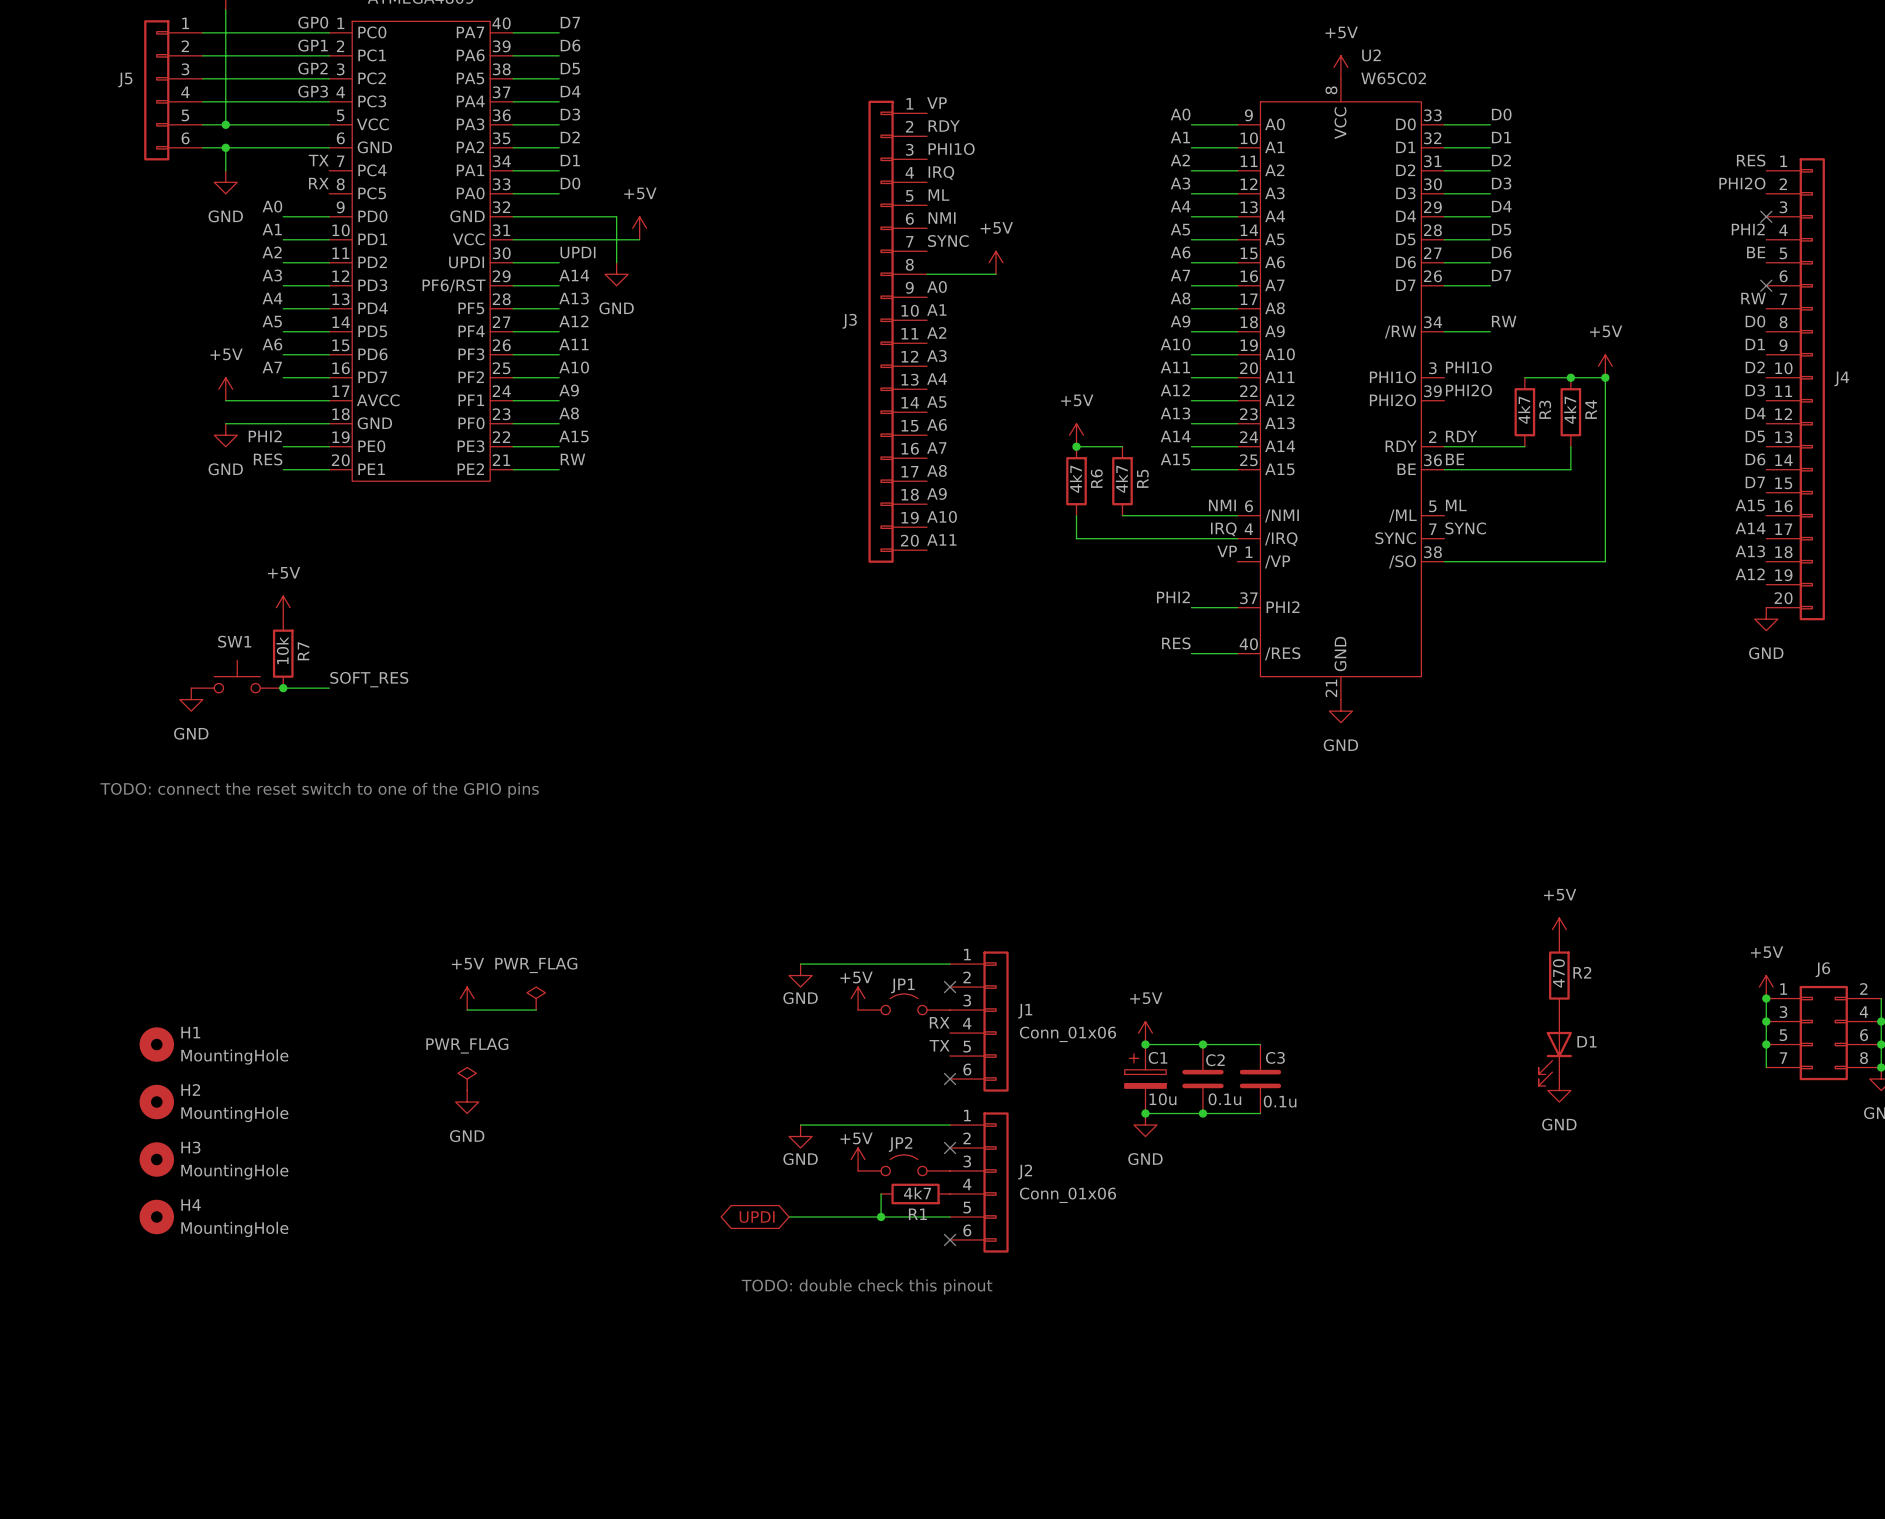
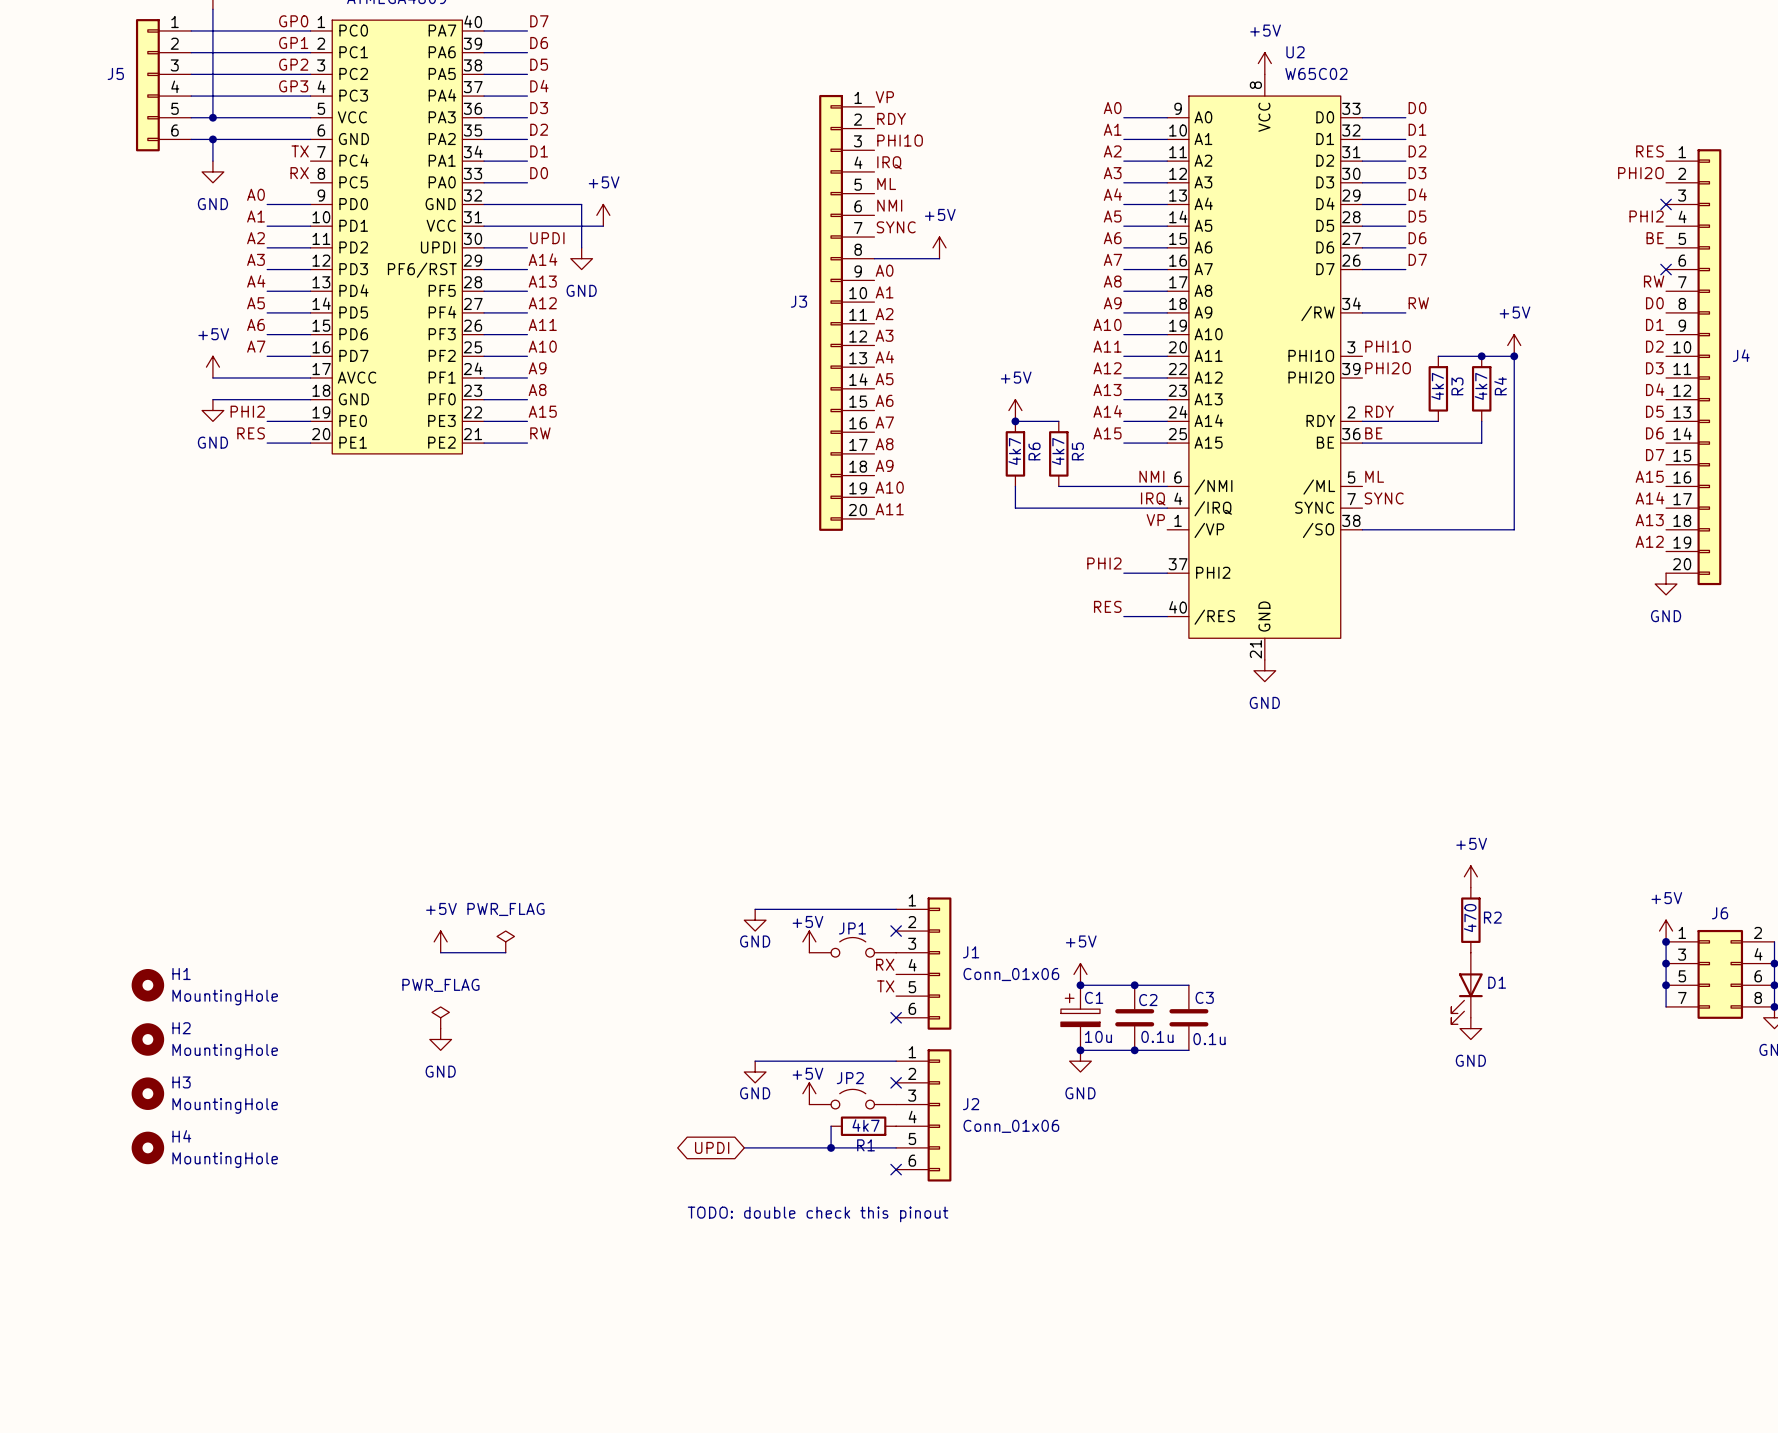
power symbol: +5V (283, 607) -> none
R7: 10k (283, 653) -> none
SW1: (237, 676) -> none
label: SOFT_RES (369, 679) -> none
wire: (283, 688) (329, 688) -> none
junction: (283, 688) -> none
power symbol: GND (191, 699) -> none
text: TODO: connect the reset switch to one of the GPIO pins (319, 790) -> none

